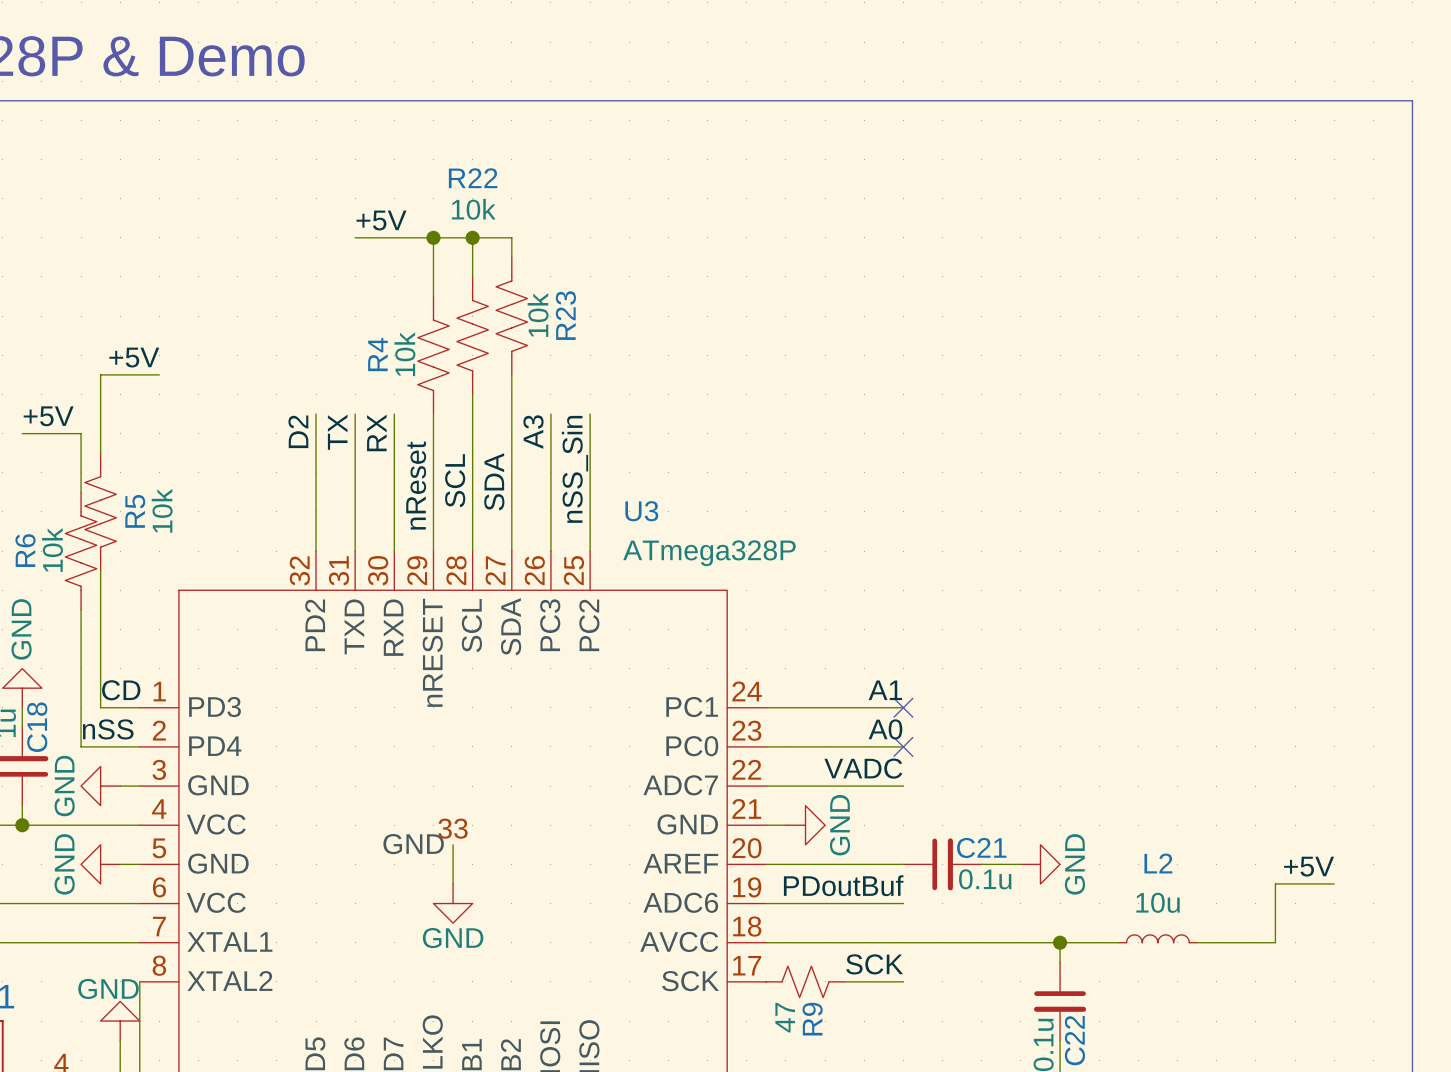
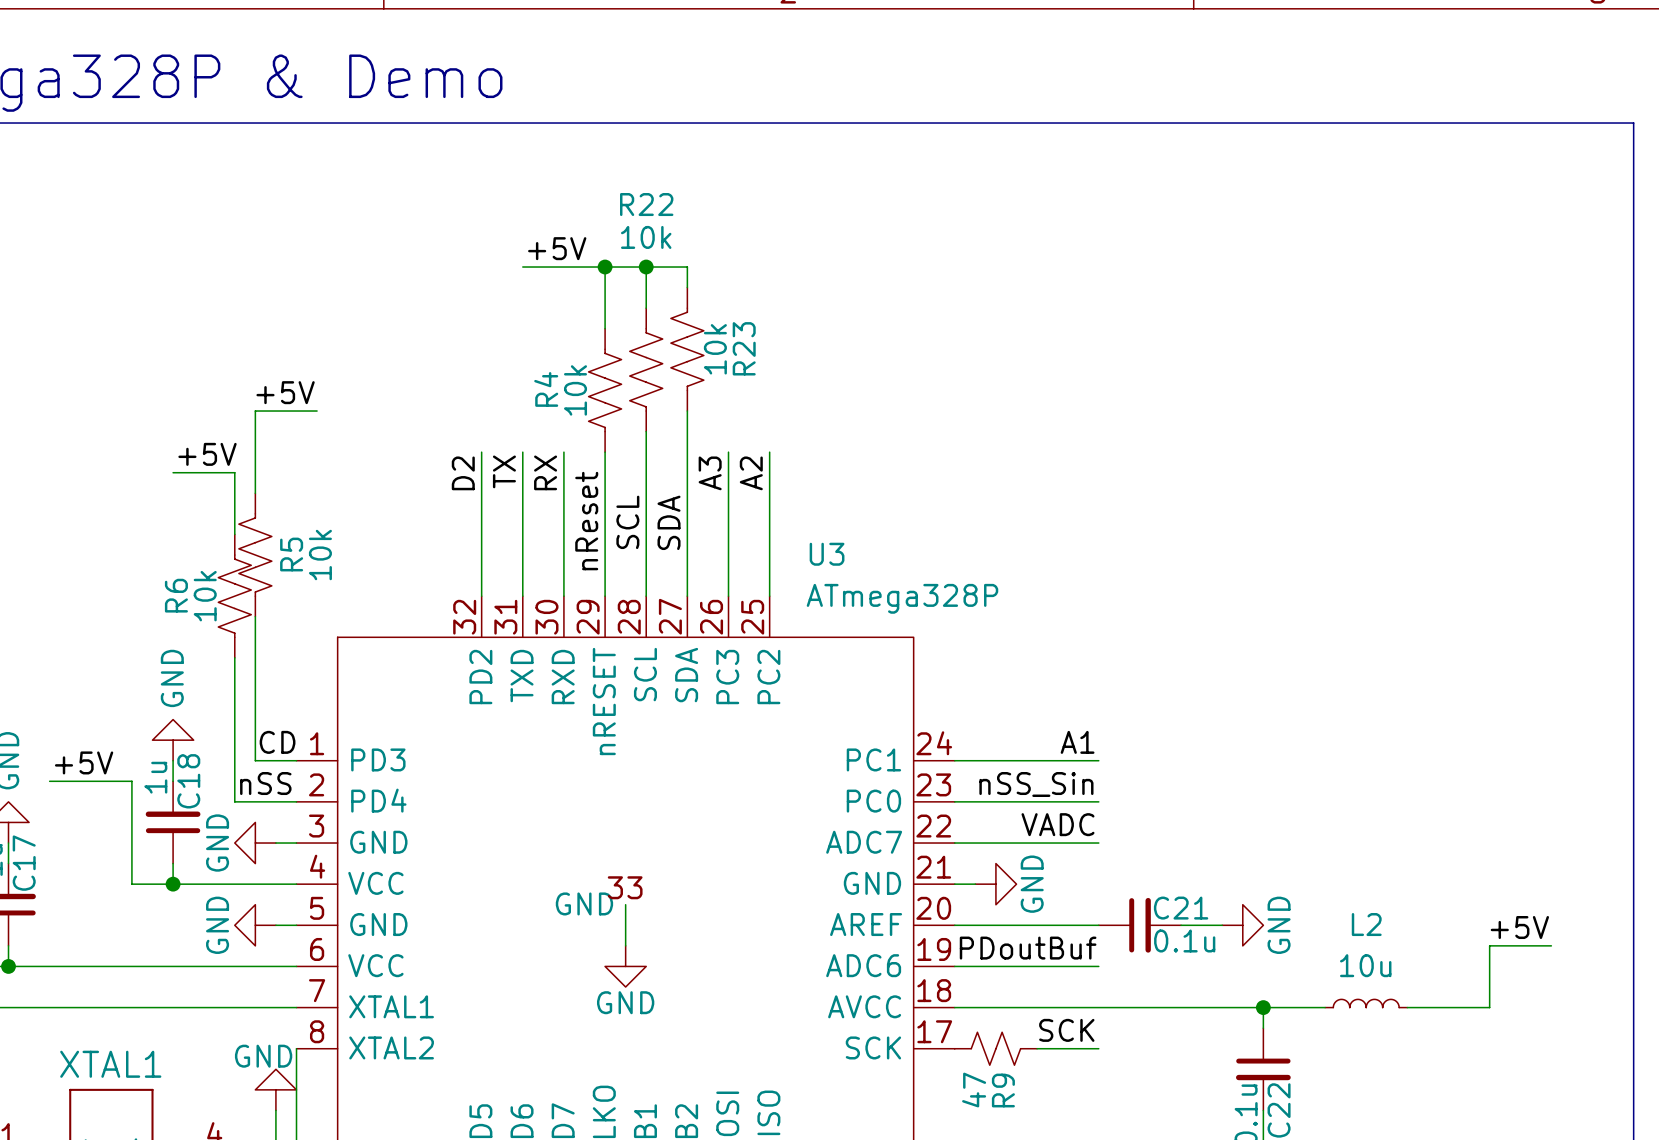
label: nSS_Sin (574, 469) -> A2 (751, 473)
no-connect mark: (903, 707) -> none
label: A0 (885, 729) -> nSS_Sin (1036, 784)
no-connect mark: (903, 746) -> none

